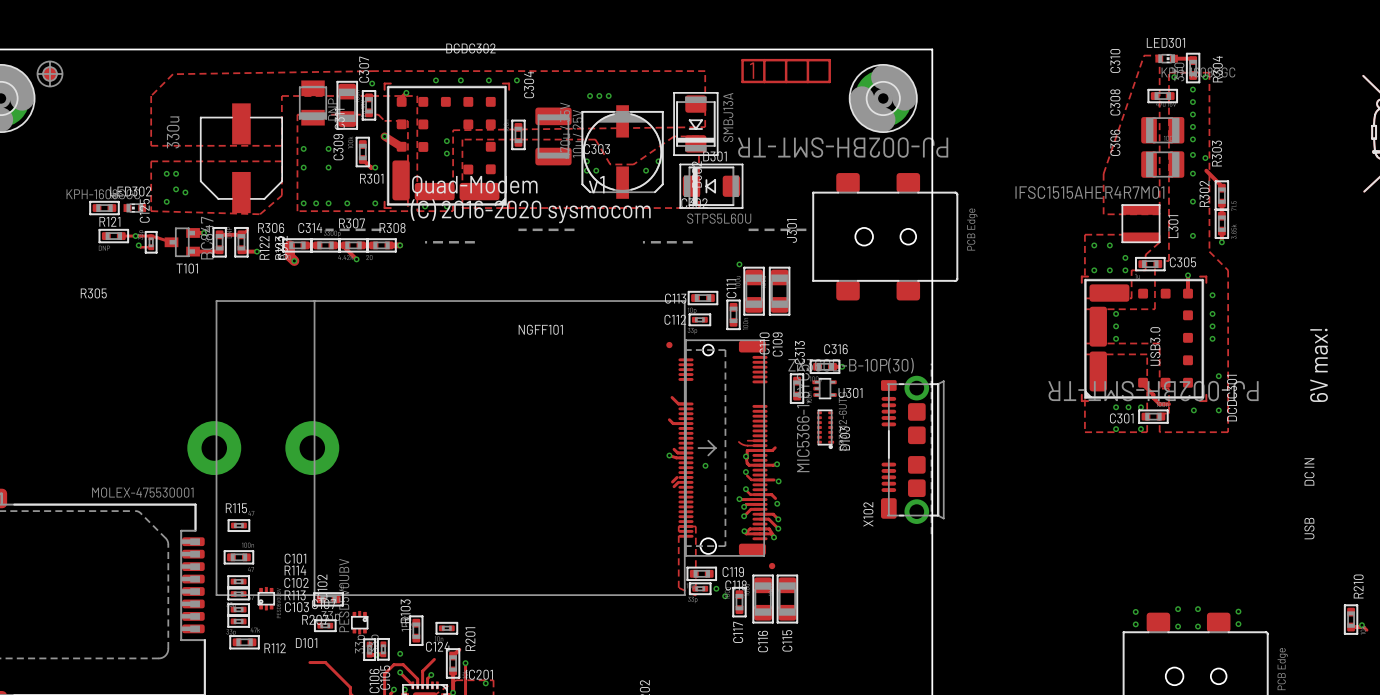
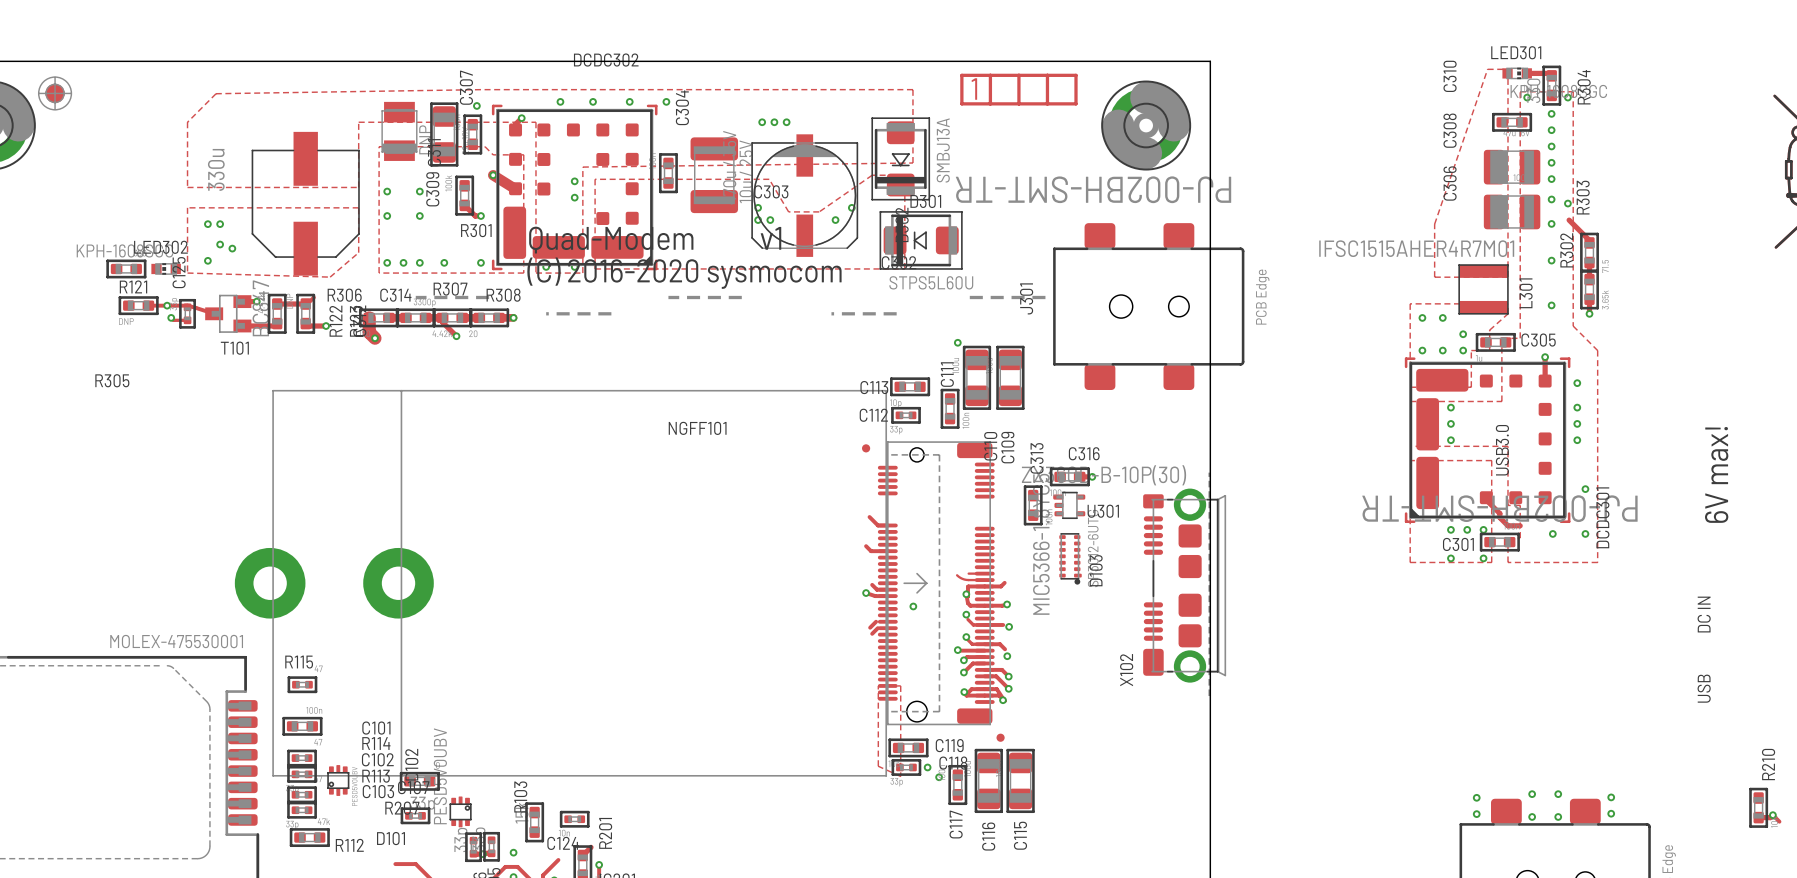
C308 footprint: [1141, 117, 1185, 144] -> [1483, 149, 1541, 185]
C306 footprint: [1141, 151, 1185, 178] -> [1483, 194, 1541, 230]

